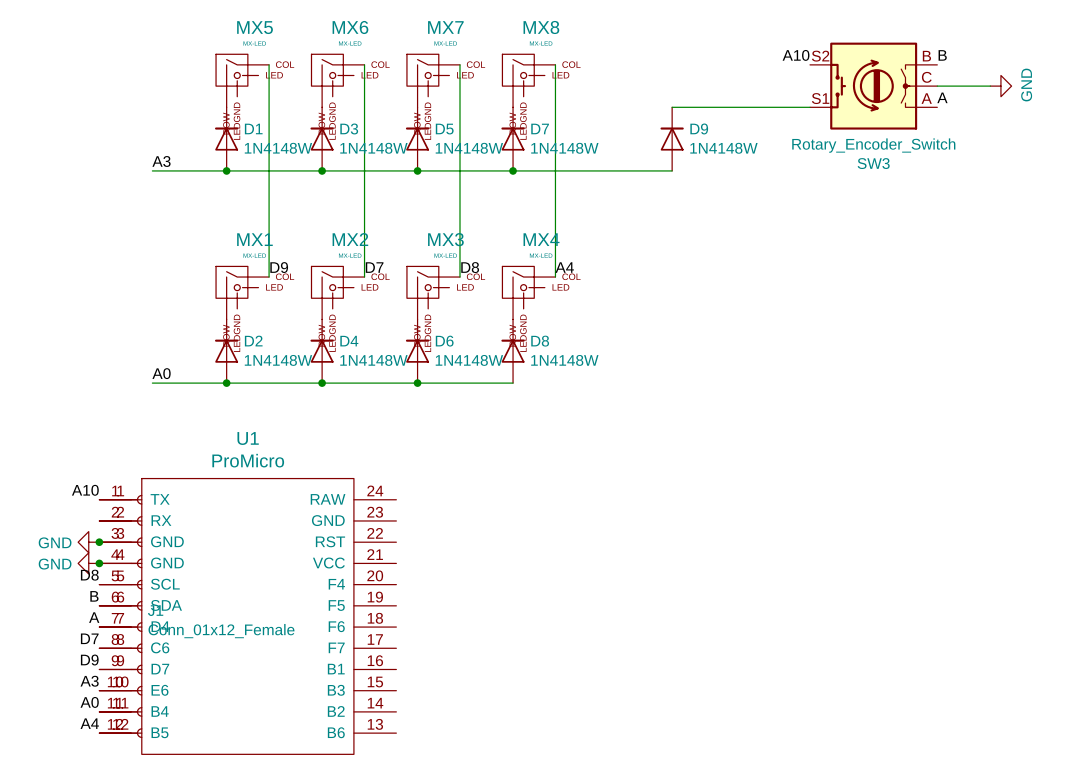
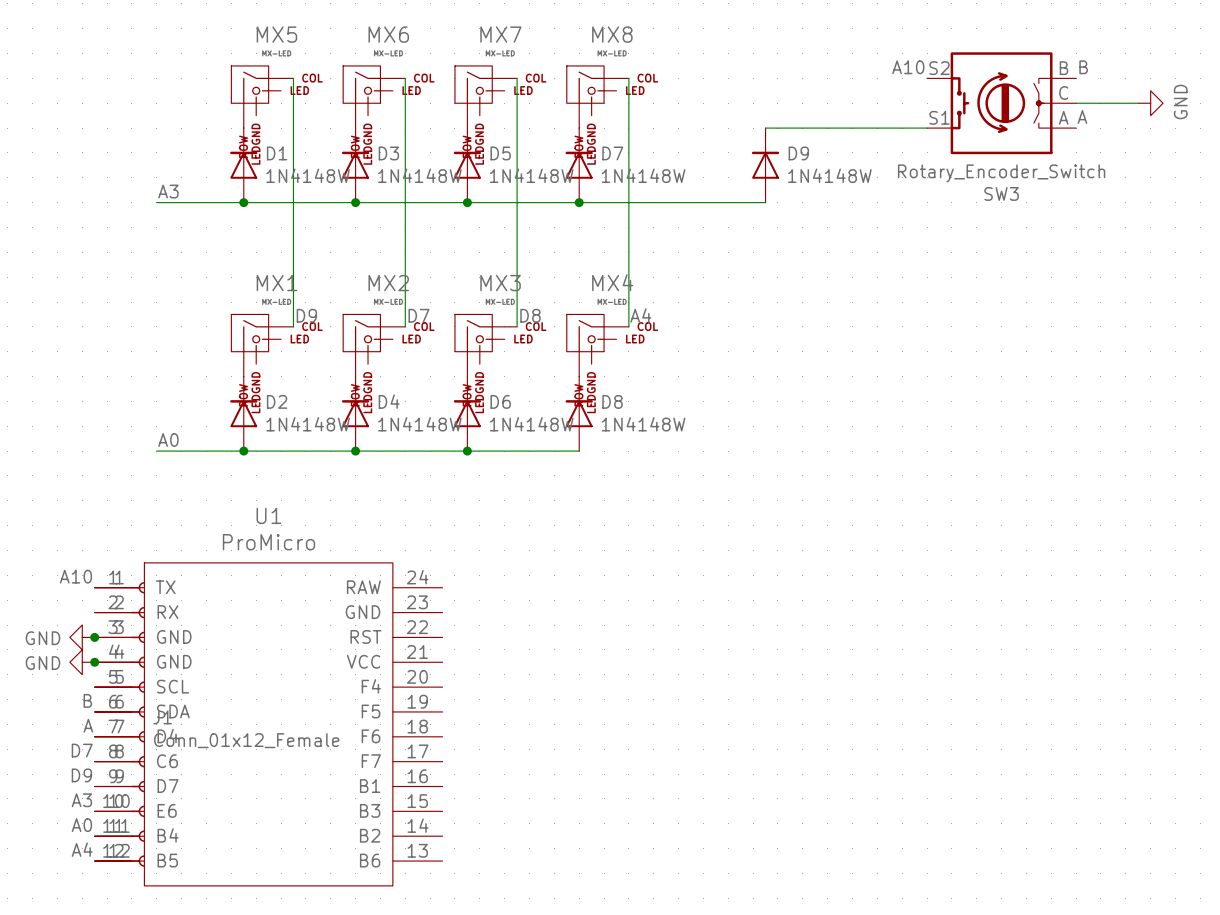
label: D8 (89, 575) -> none

